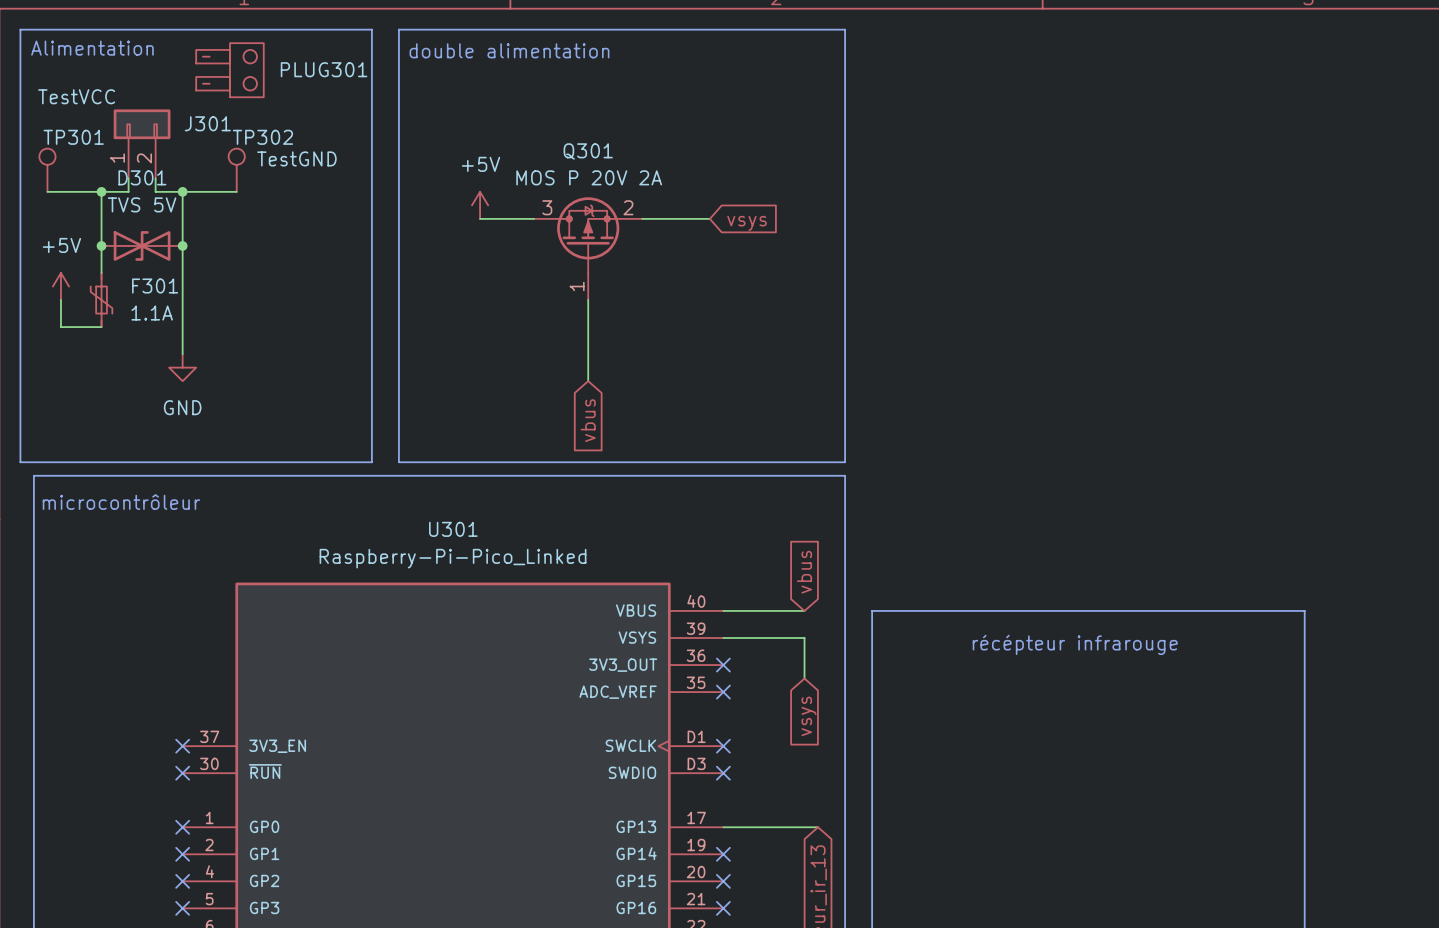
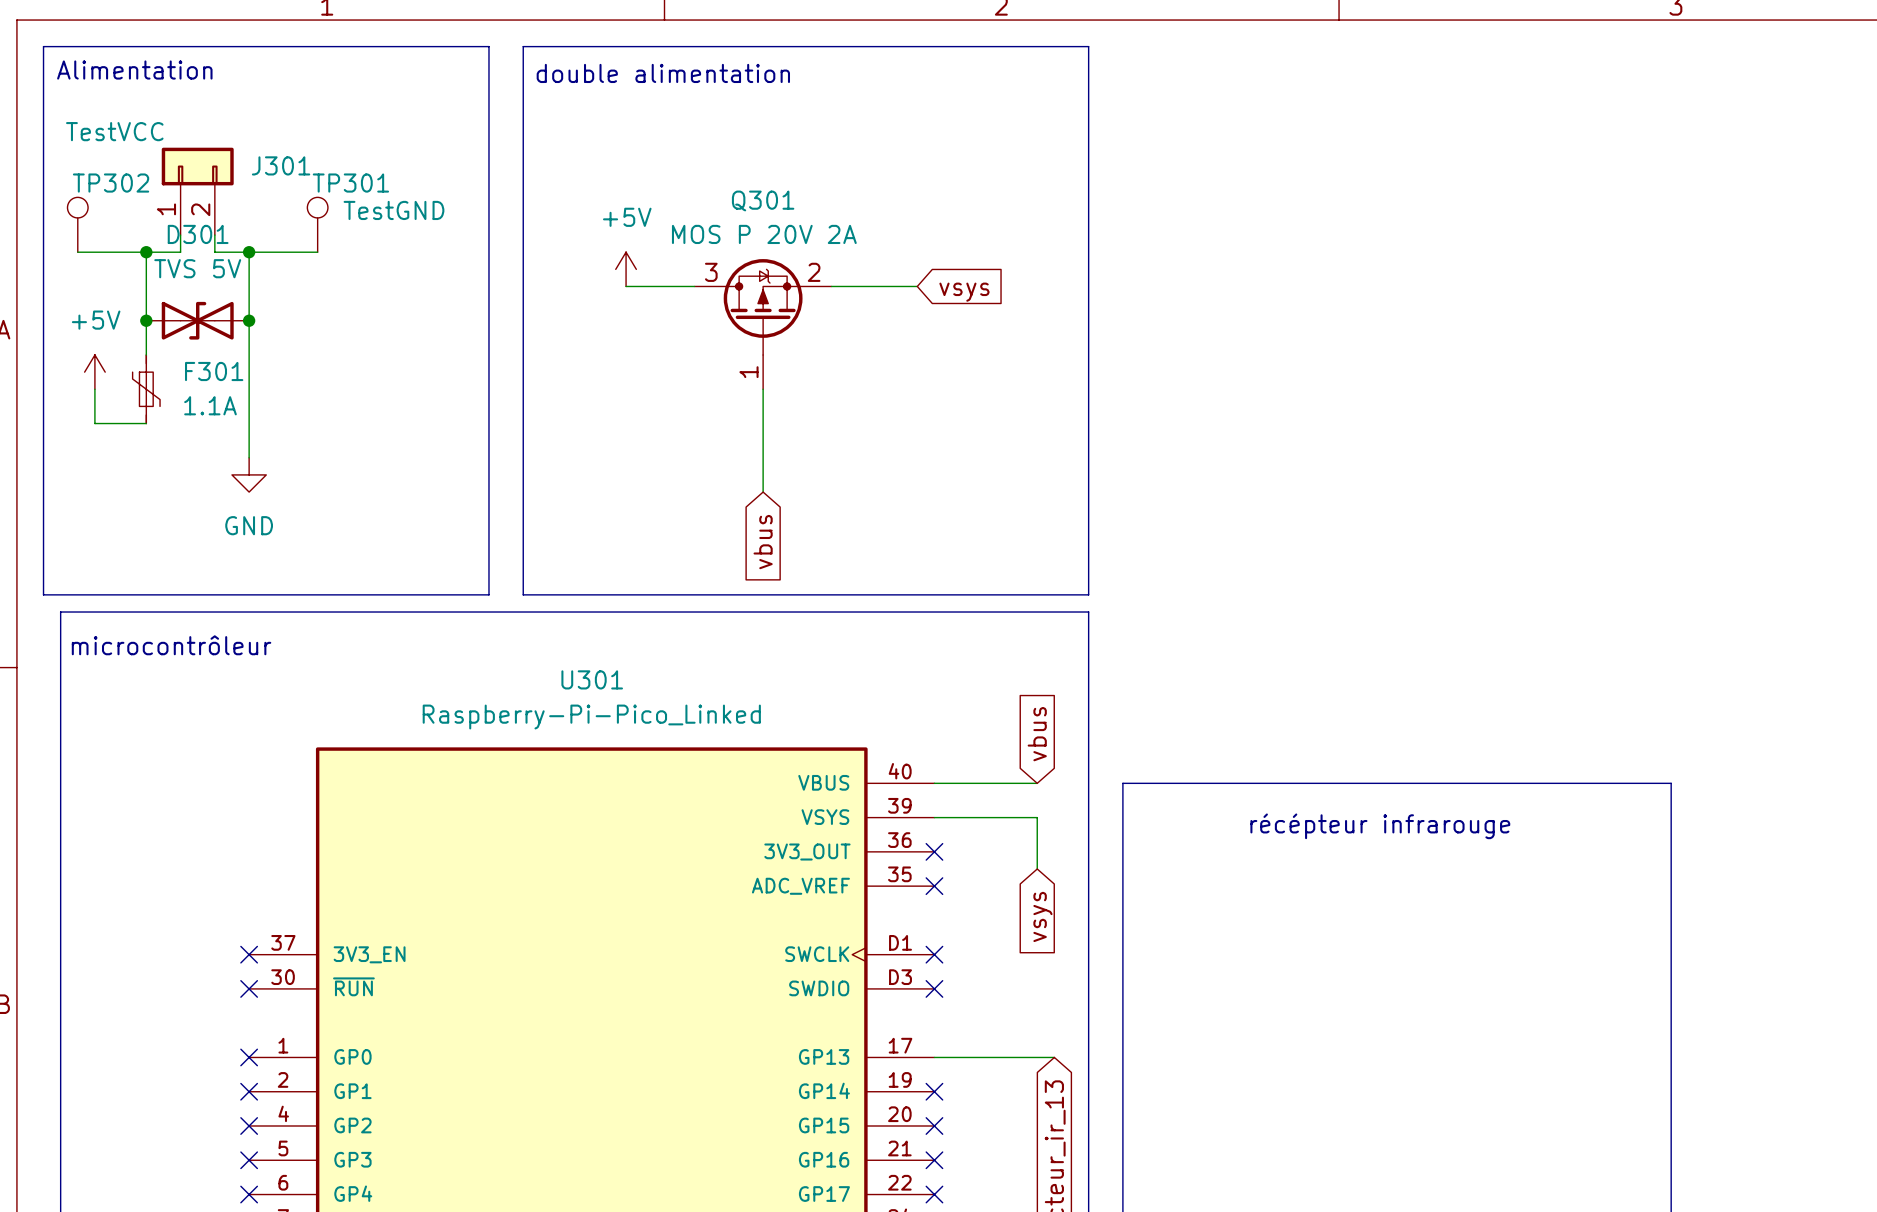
PLUG301: (229, 70) -> none
TP301 name: TP301 (73, 137) -> TP302 (111, 183)
TP302 name: TP302 (262, 137) -> TP301 (350, 183)

